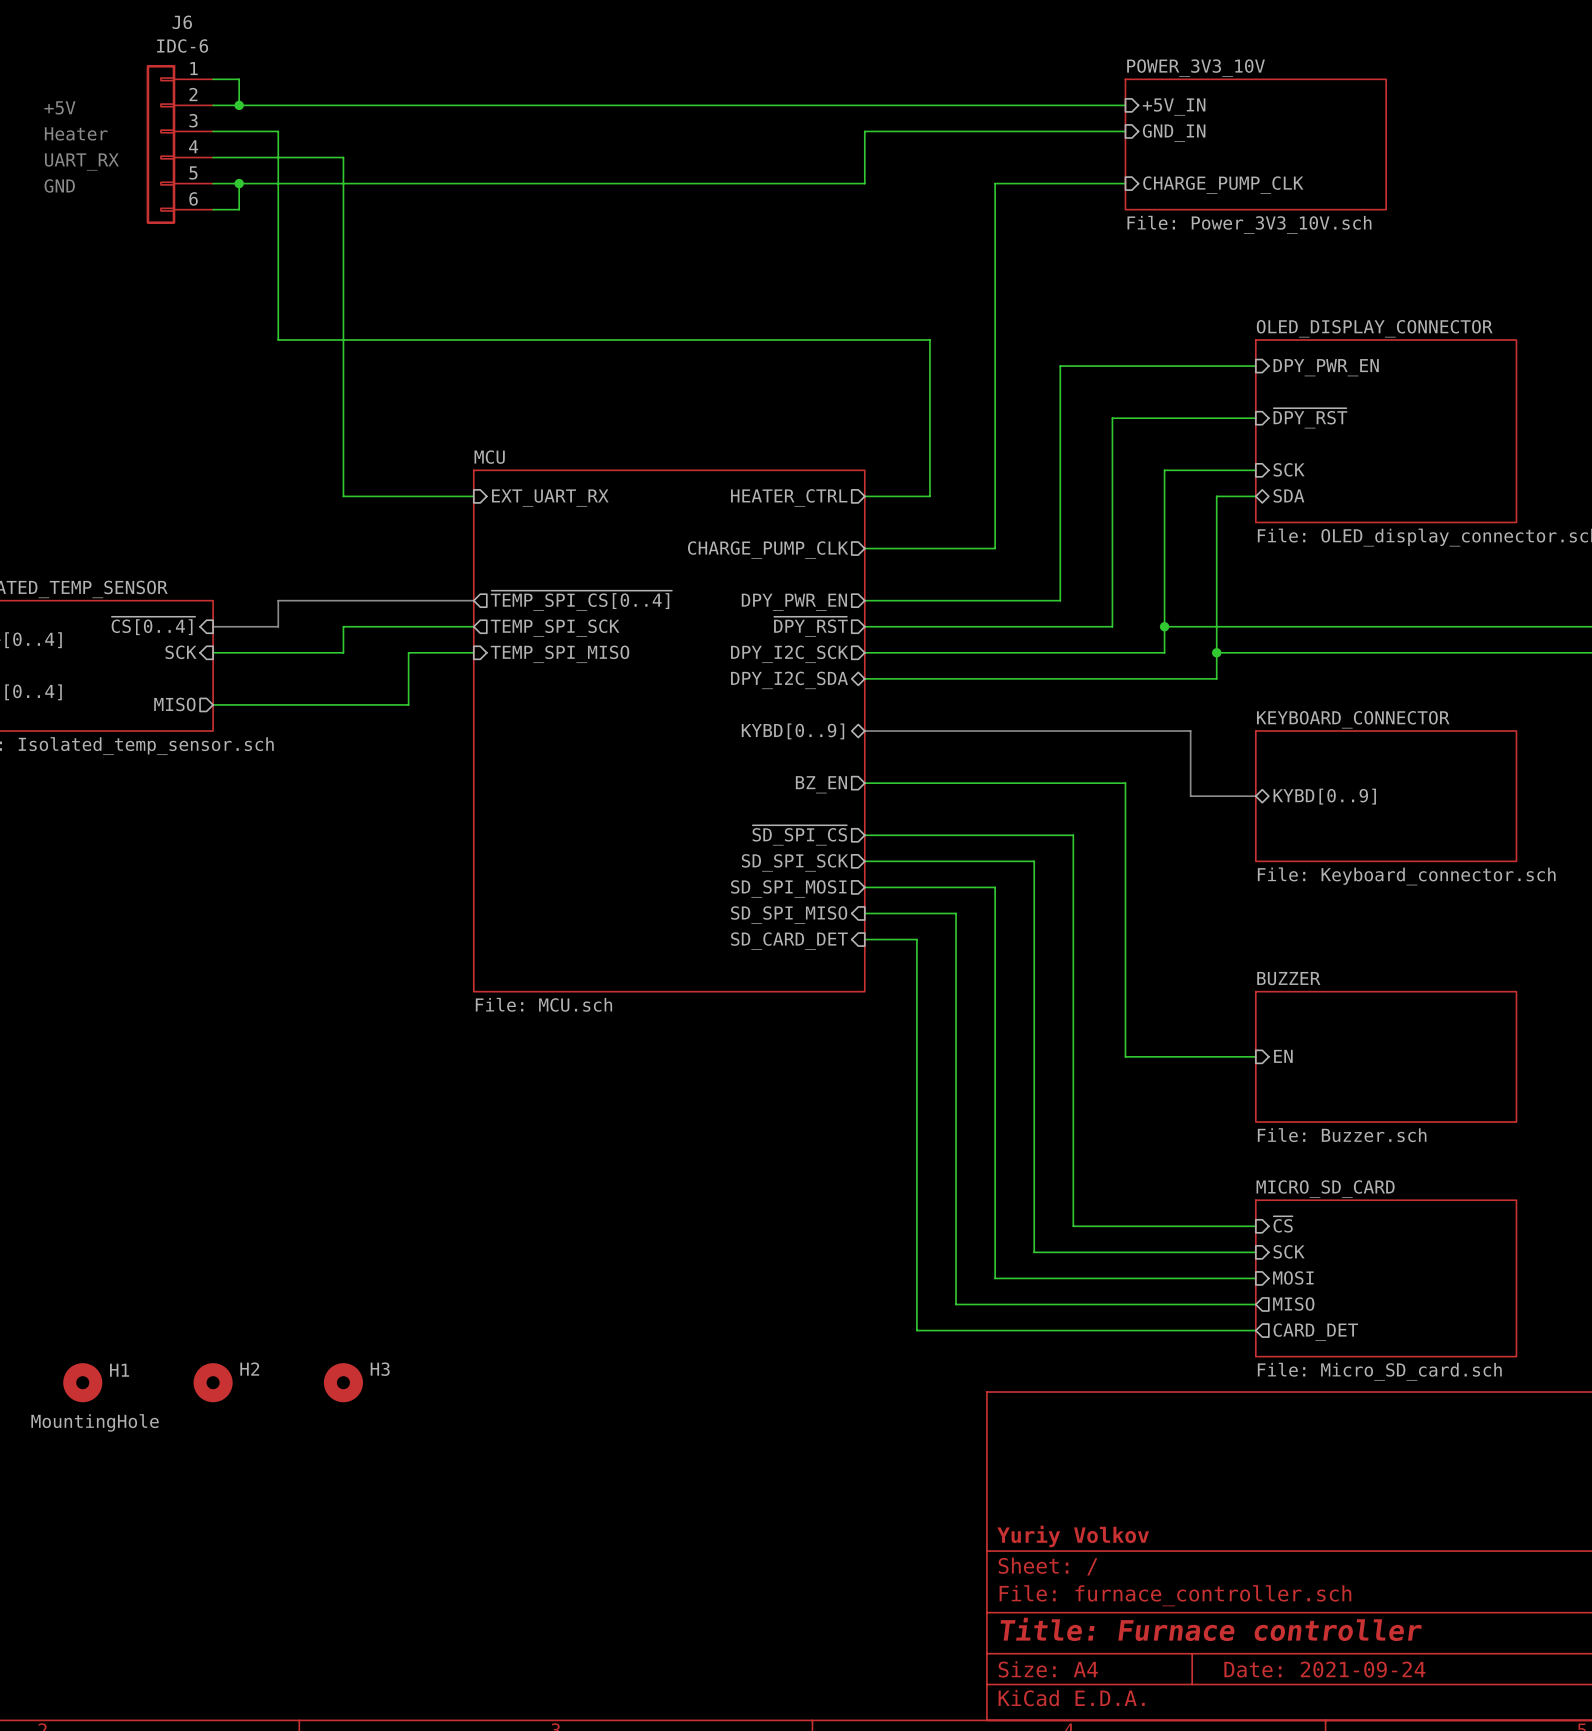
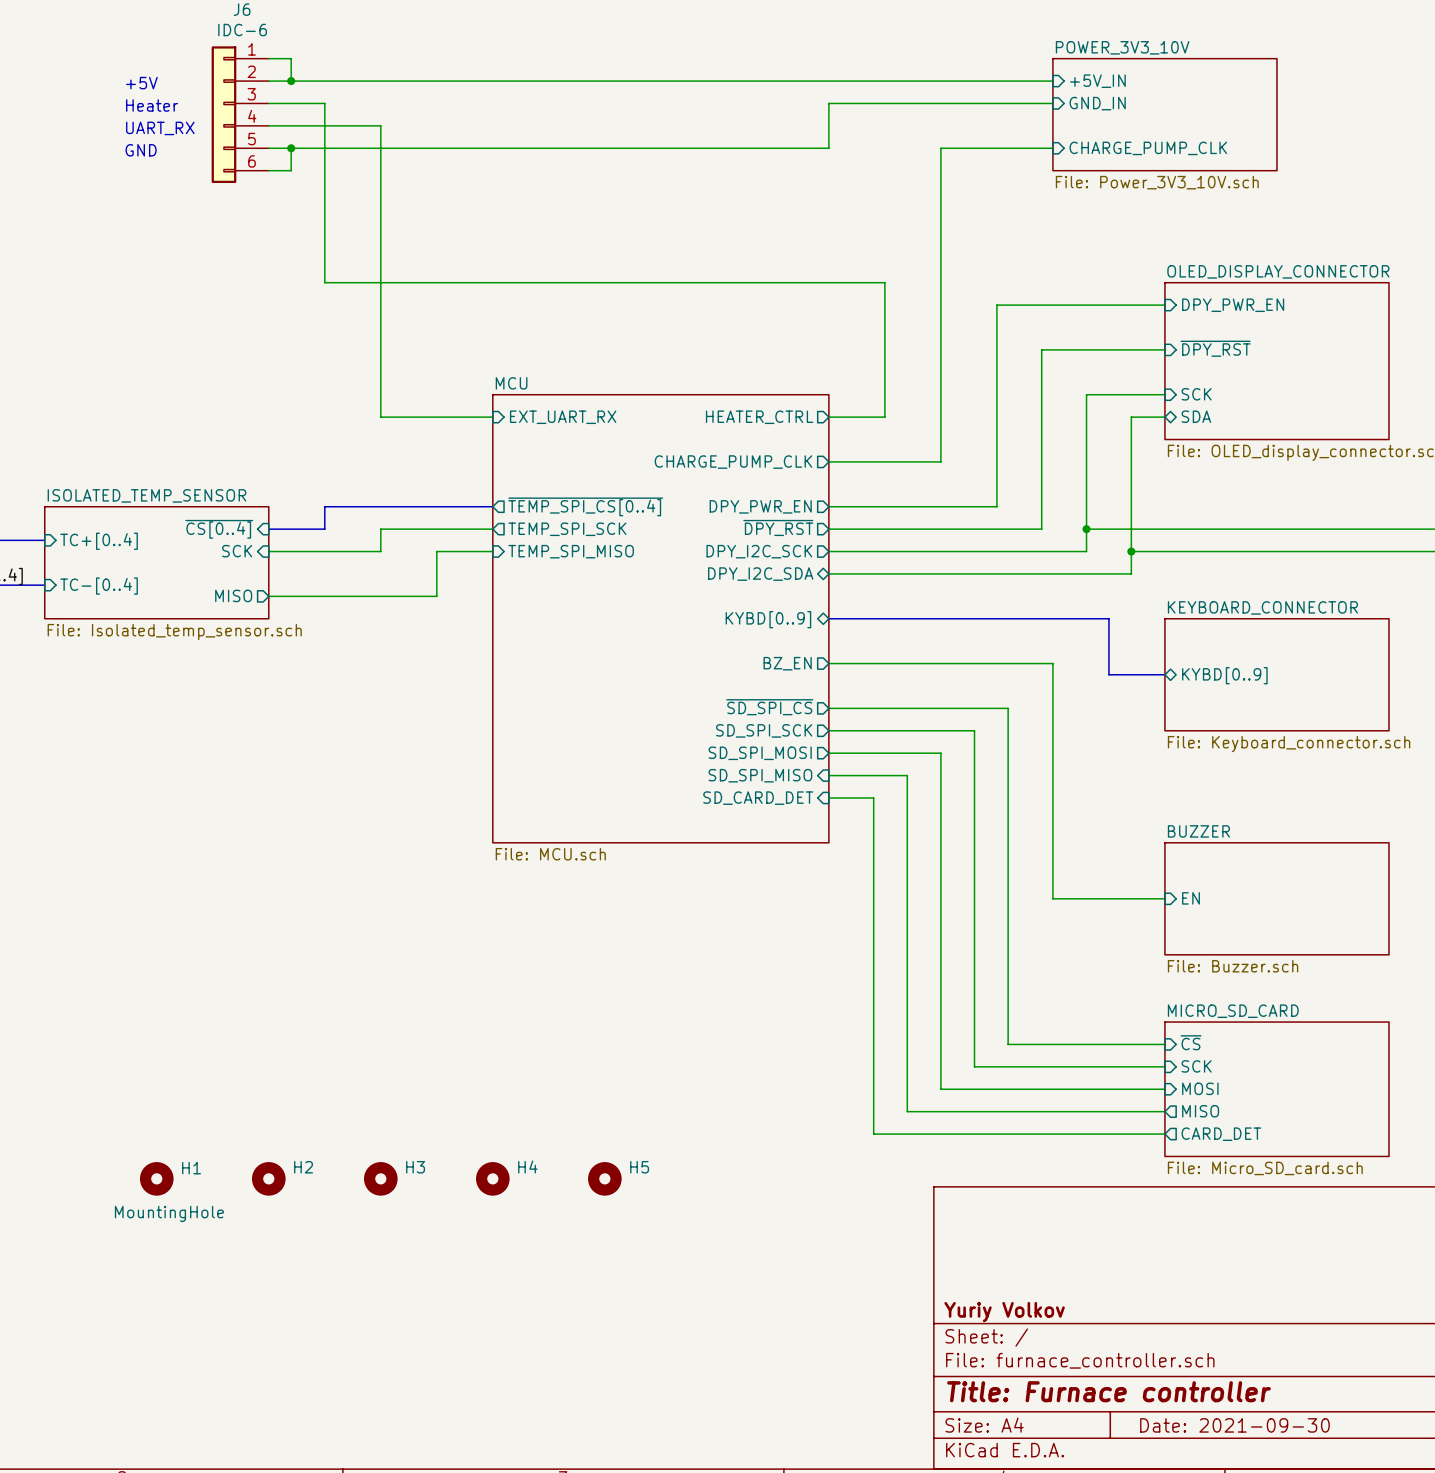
H4: none -> (492, 1178)
H5: none -> (604, 1178)
title block: Date: 2021-09-24 (1324, 1669) -> Date: 2021-09-30 (1234, 1425)

